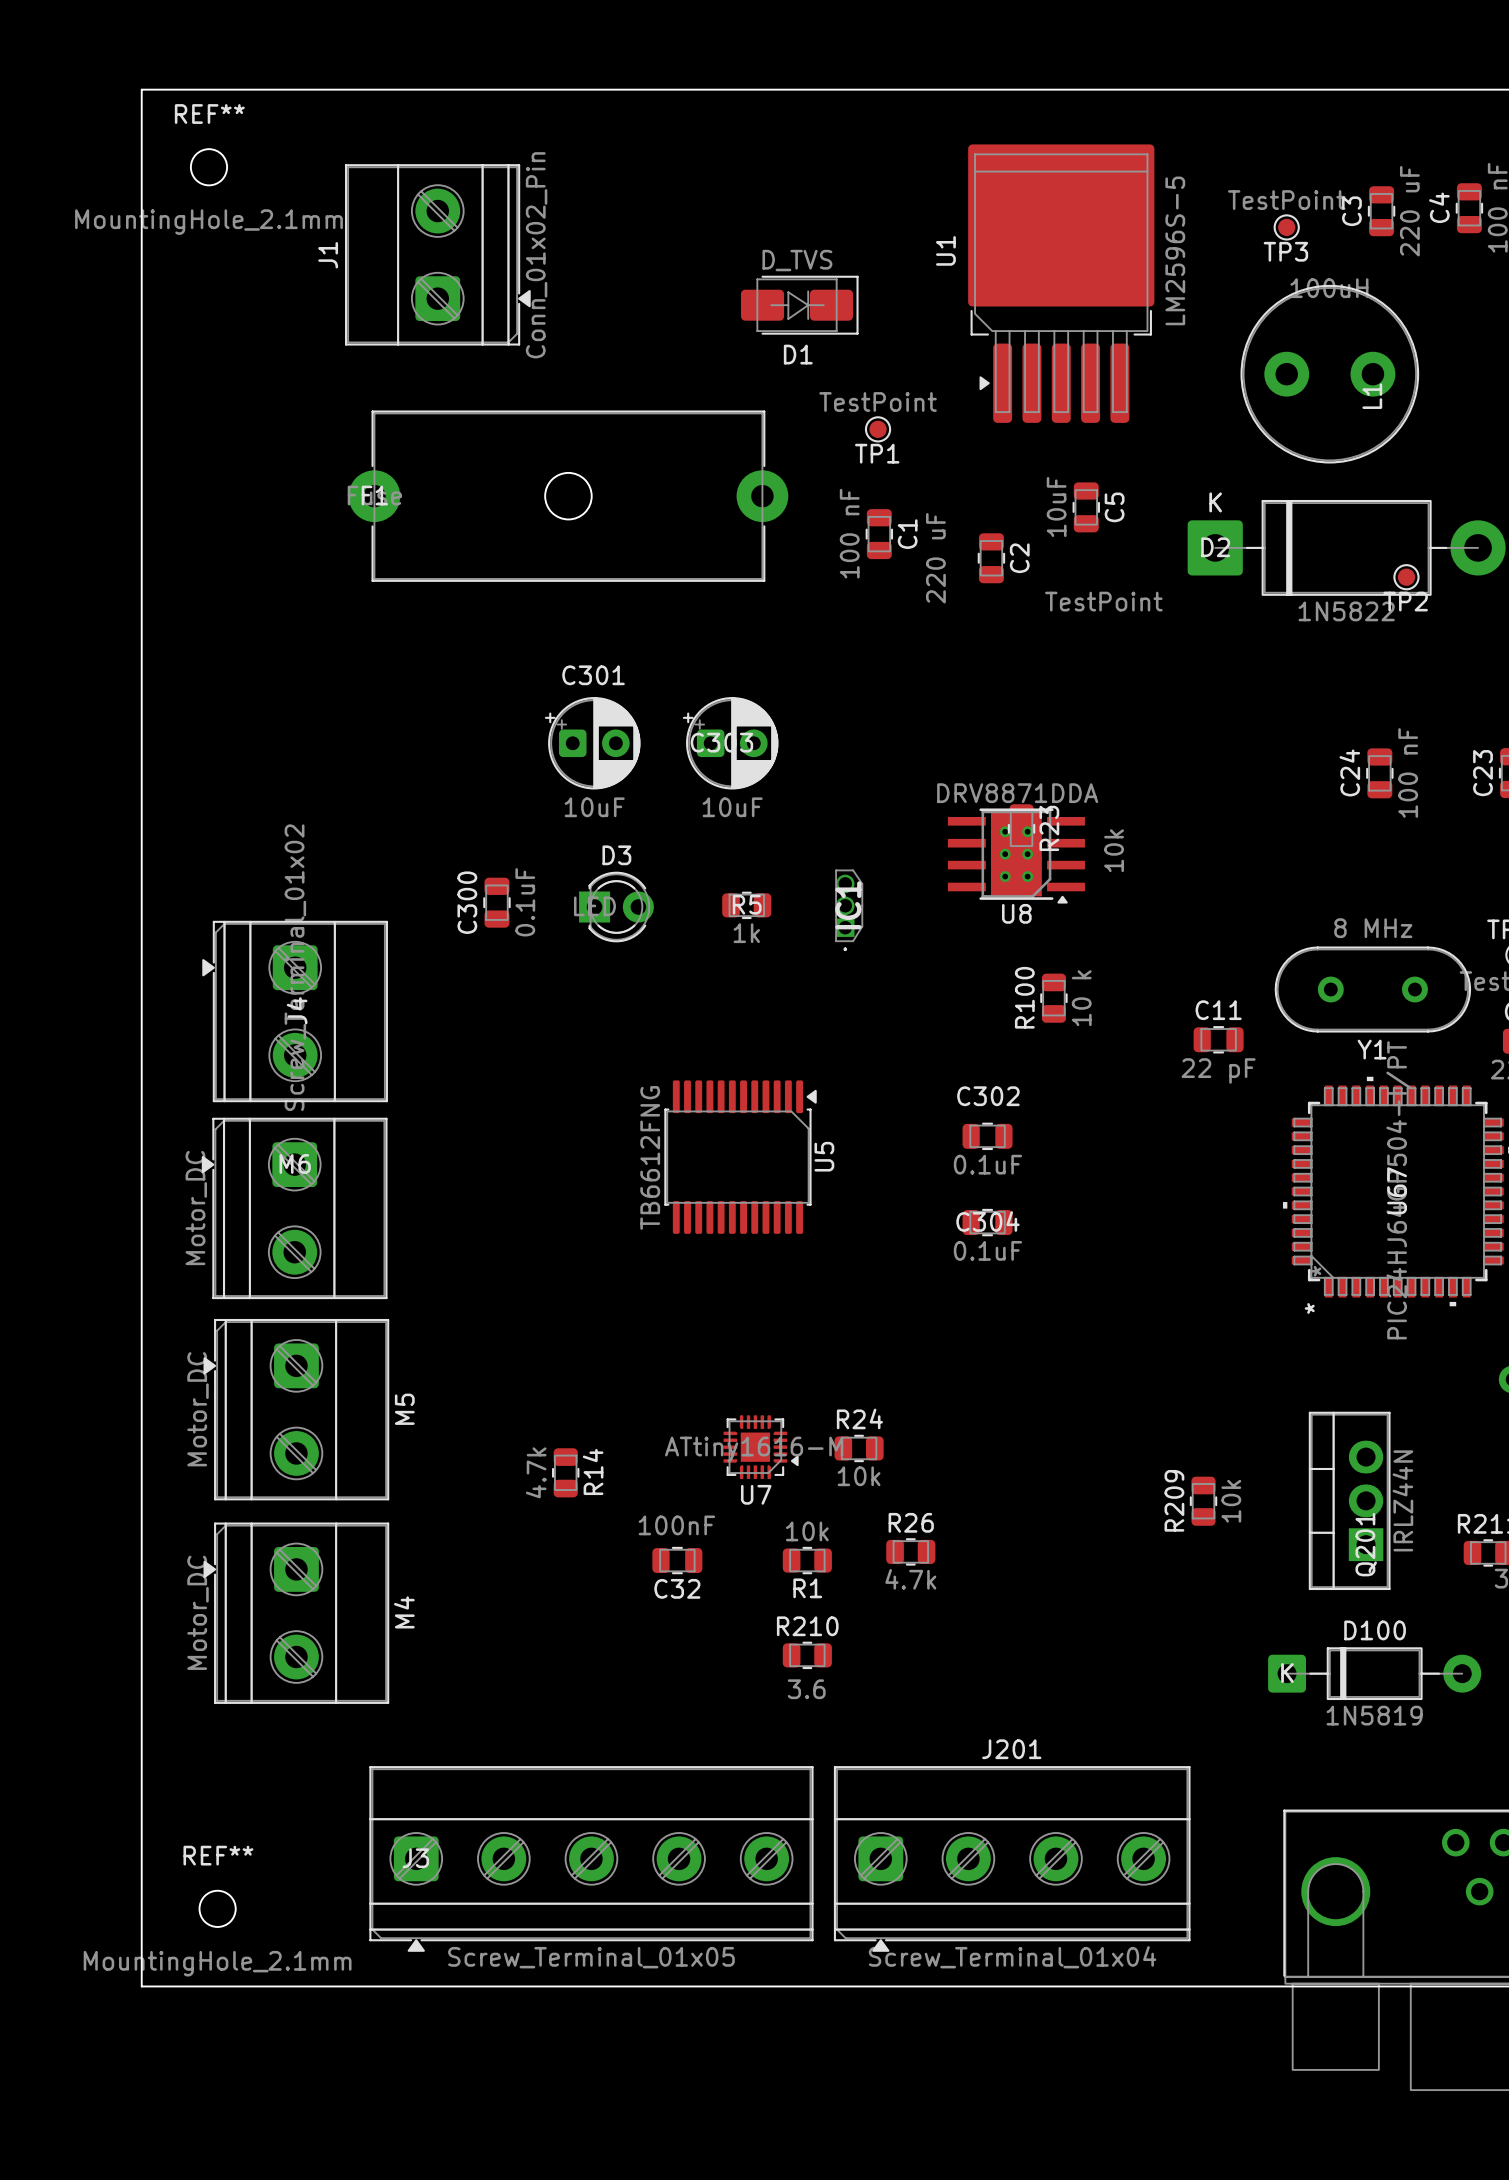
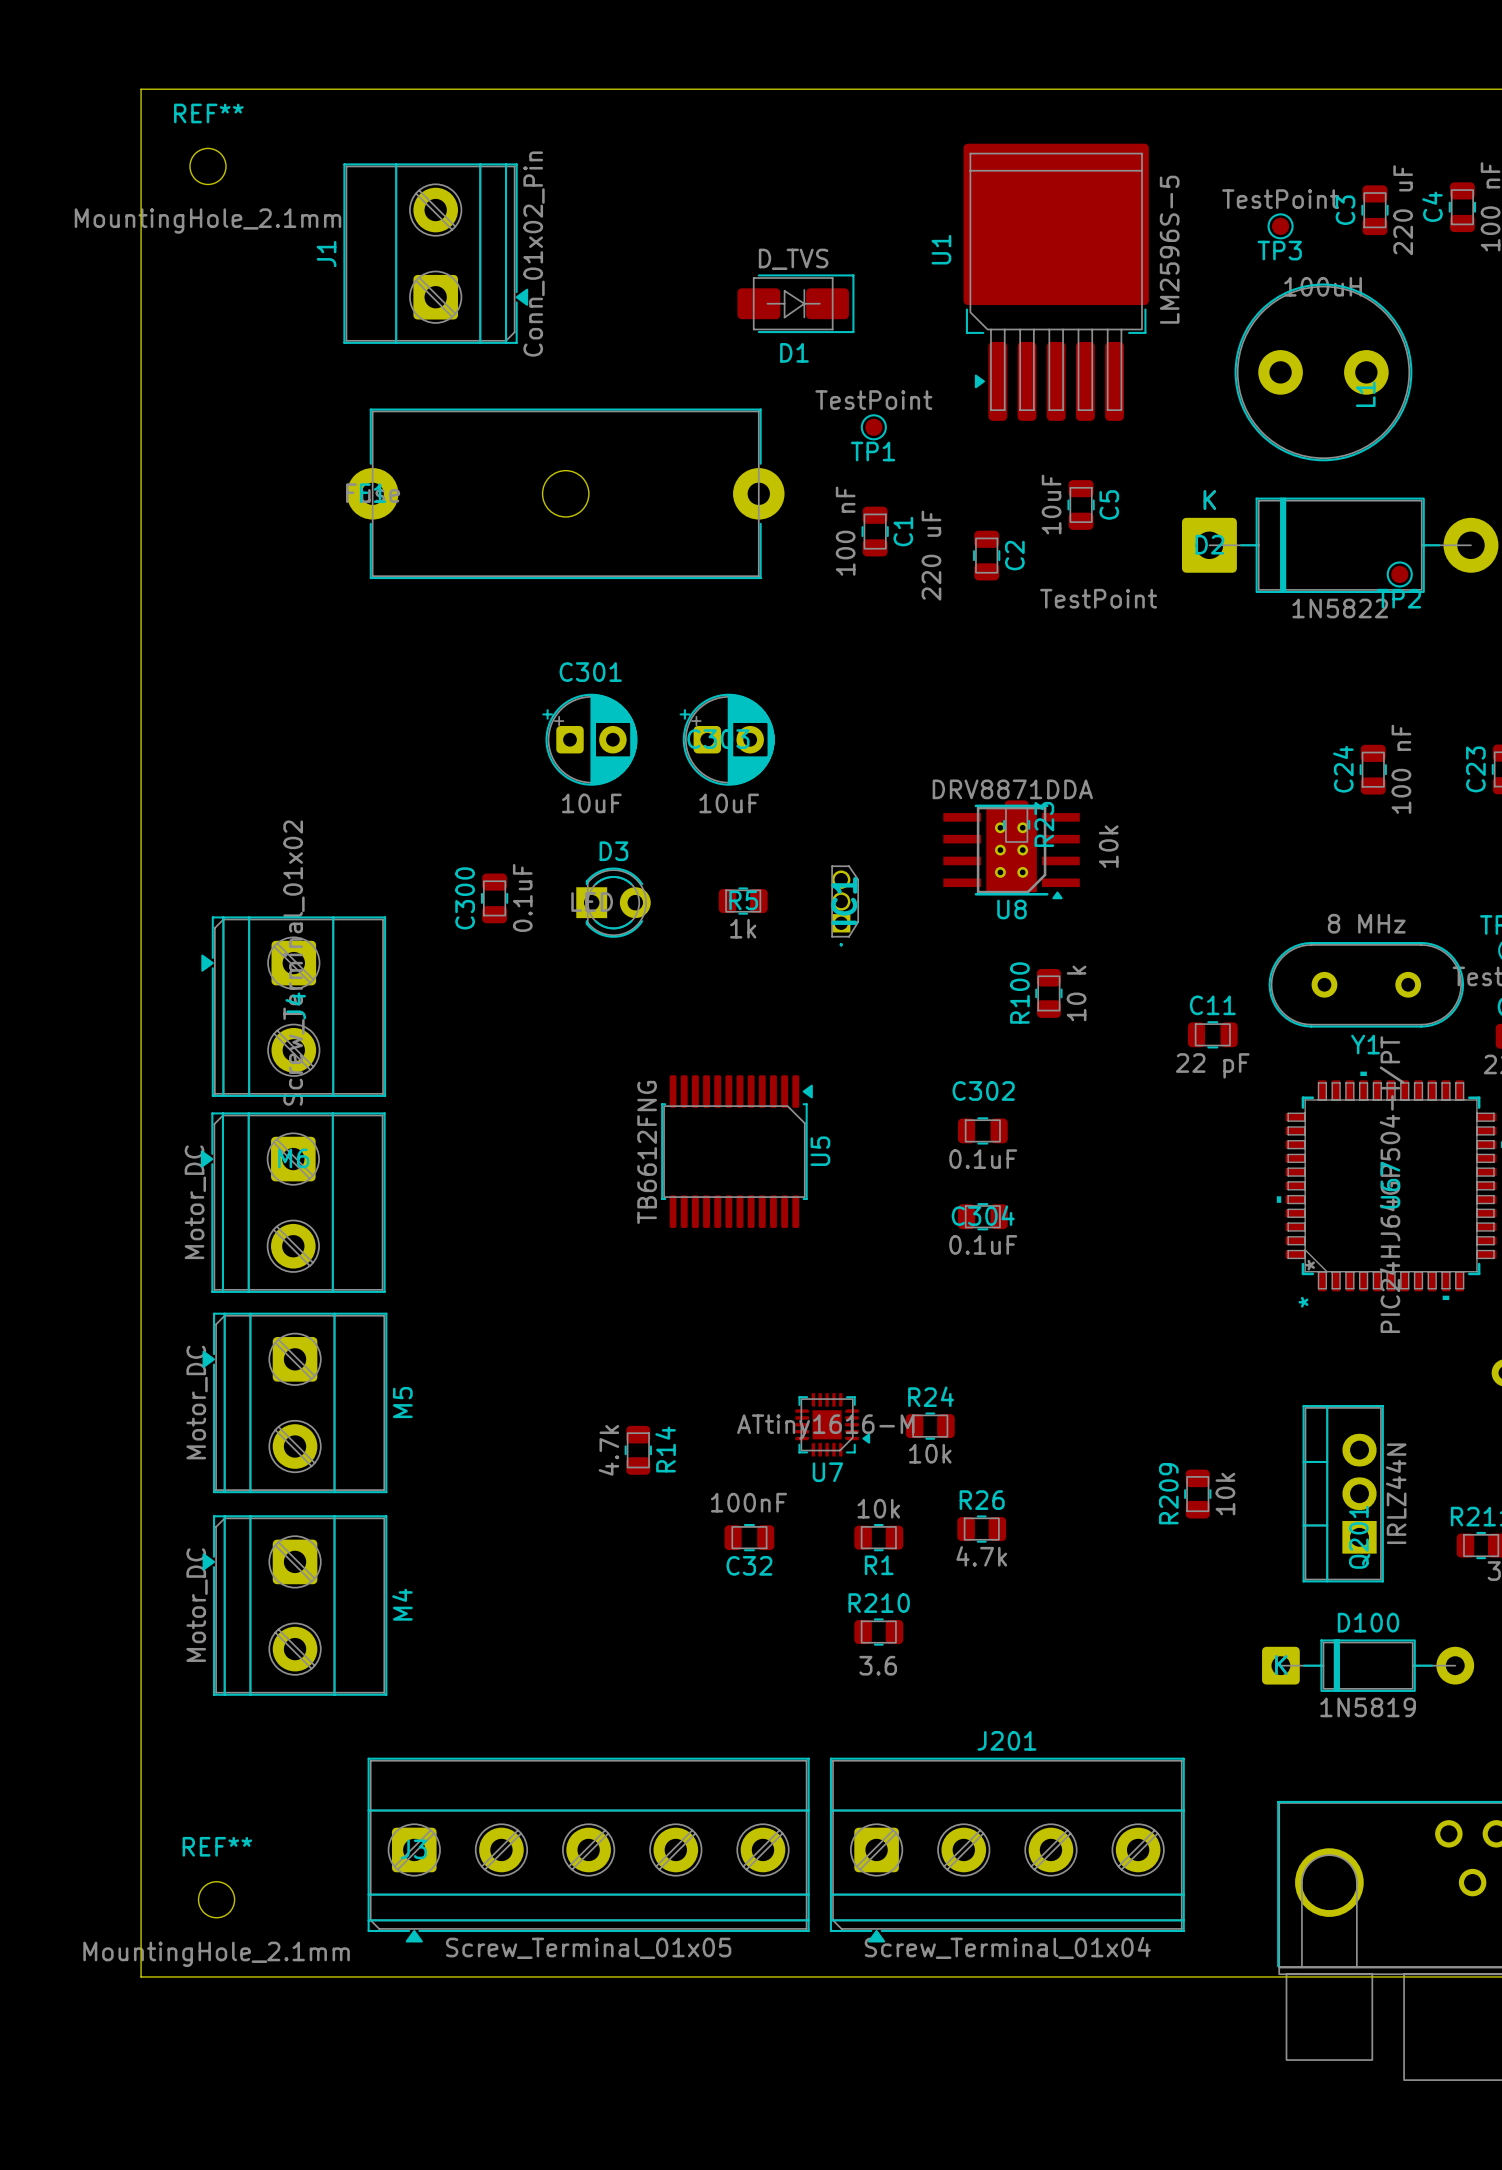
U7 position: (761, 1447) -> (832, 1424)
R24 position: (859, 1448) -> (930, 1426)
R14 position: (565, 1472) -> (638, 1450)
R26 position: (910, 1551) -> (981, 1529)
C32 position: (677, 1560) -> (749, 1537)
R1 position: (807, 1560) -> (878, 1537)
R210 position: (807, 1655) -> (878, 1632)

